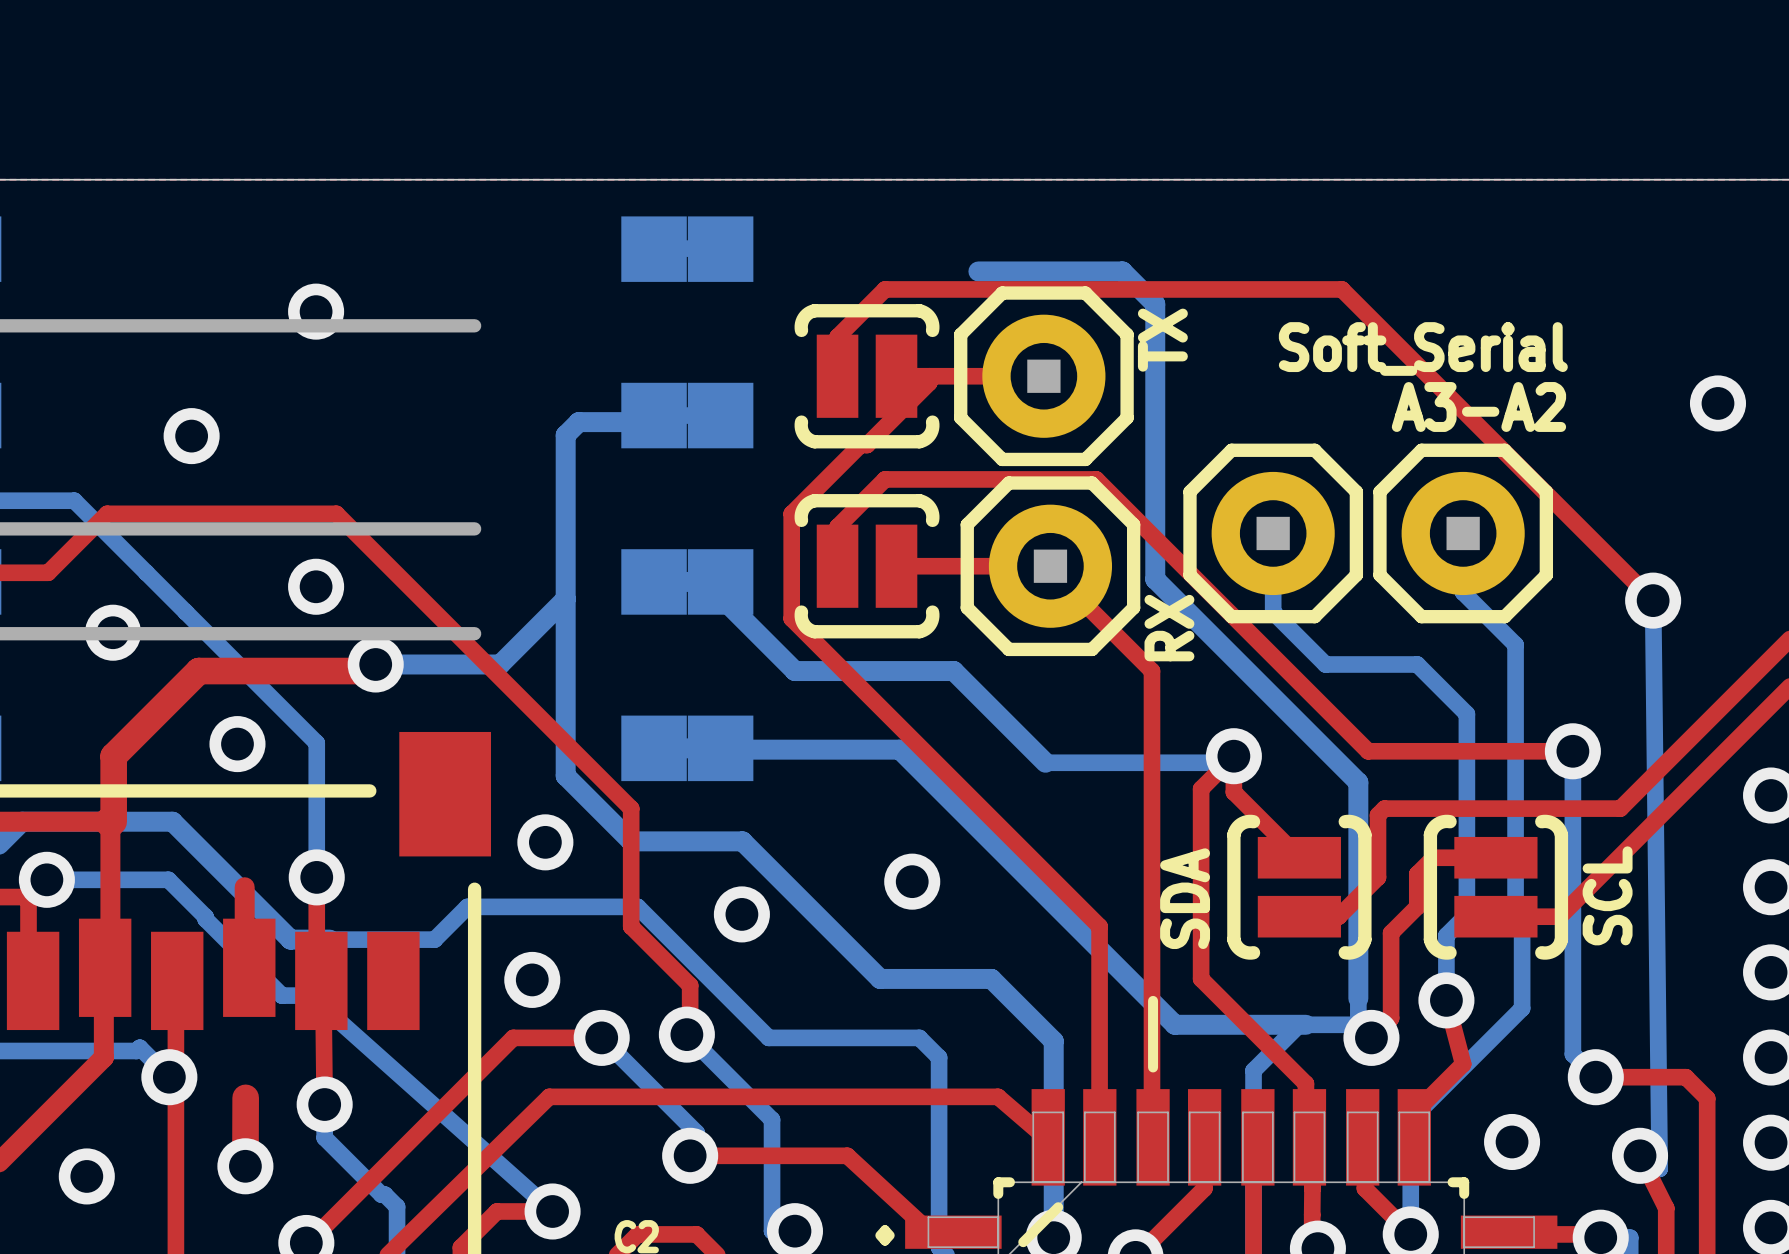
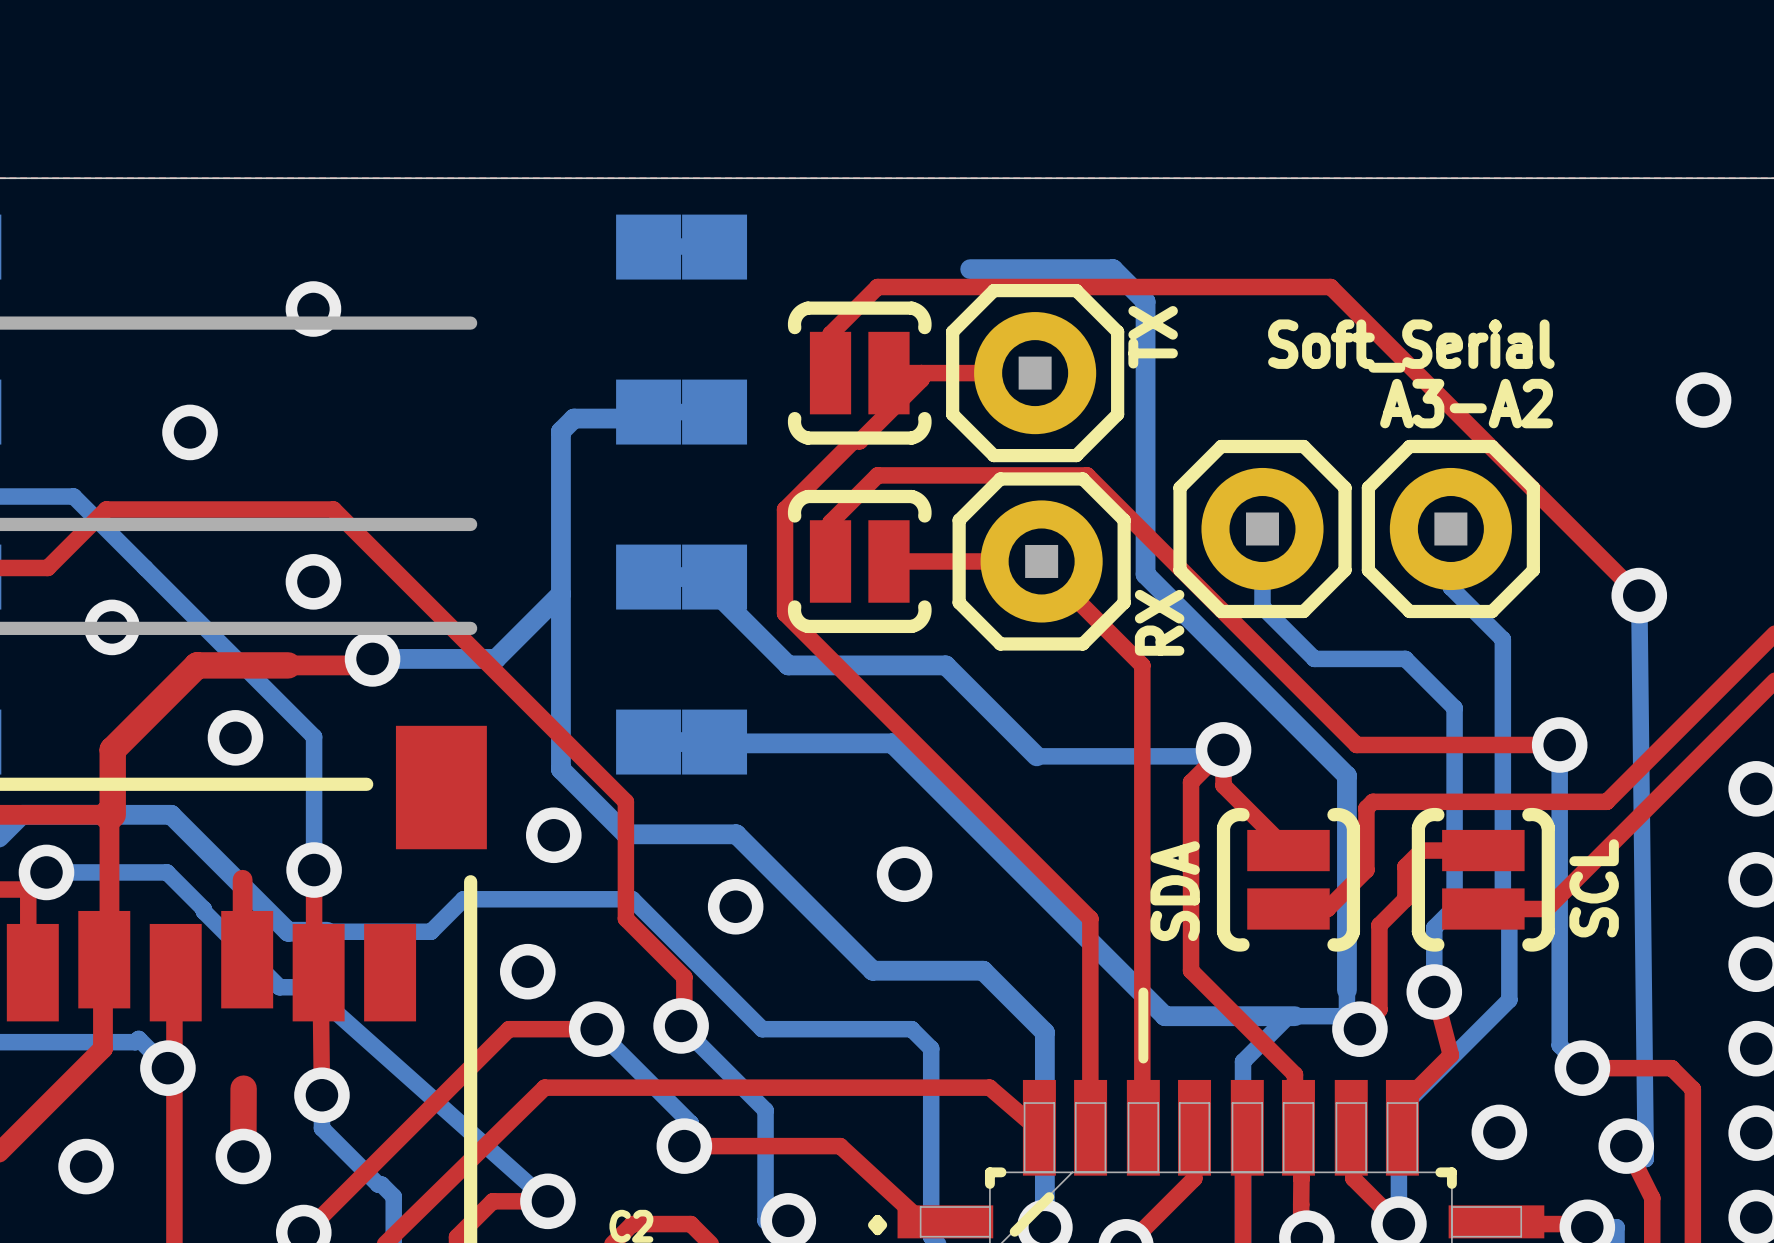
top track width: thick (290, 671) (362, 671) -> thin (288, 665) (359, 665)
via position: (545, 842) -> (553, 835)

